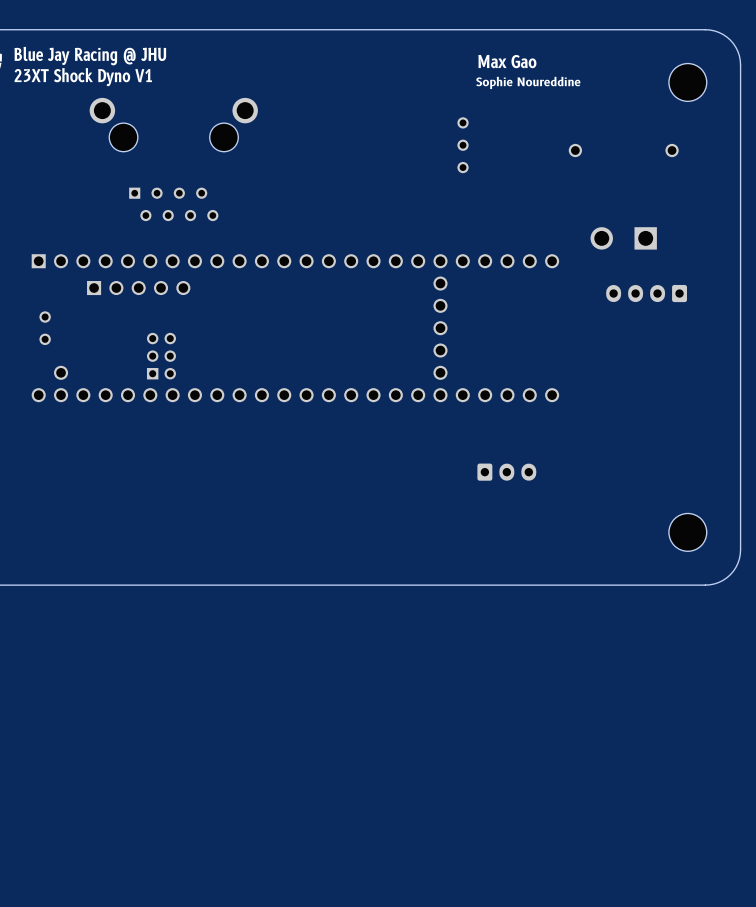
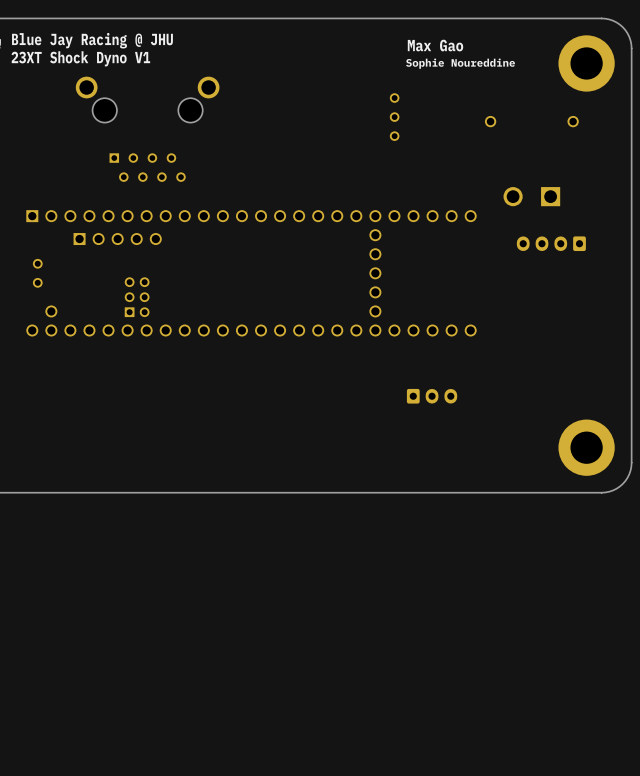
part footprint: [668, 63, 707, 102] -> [558, 35, 615, 92]
part footprint: [668, 513, 707, 552] -> [558, 419, 615, 476]

